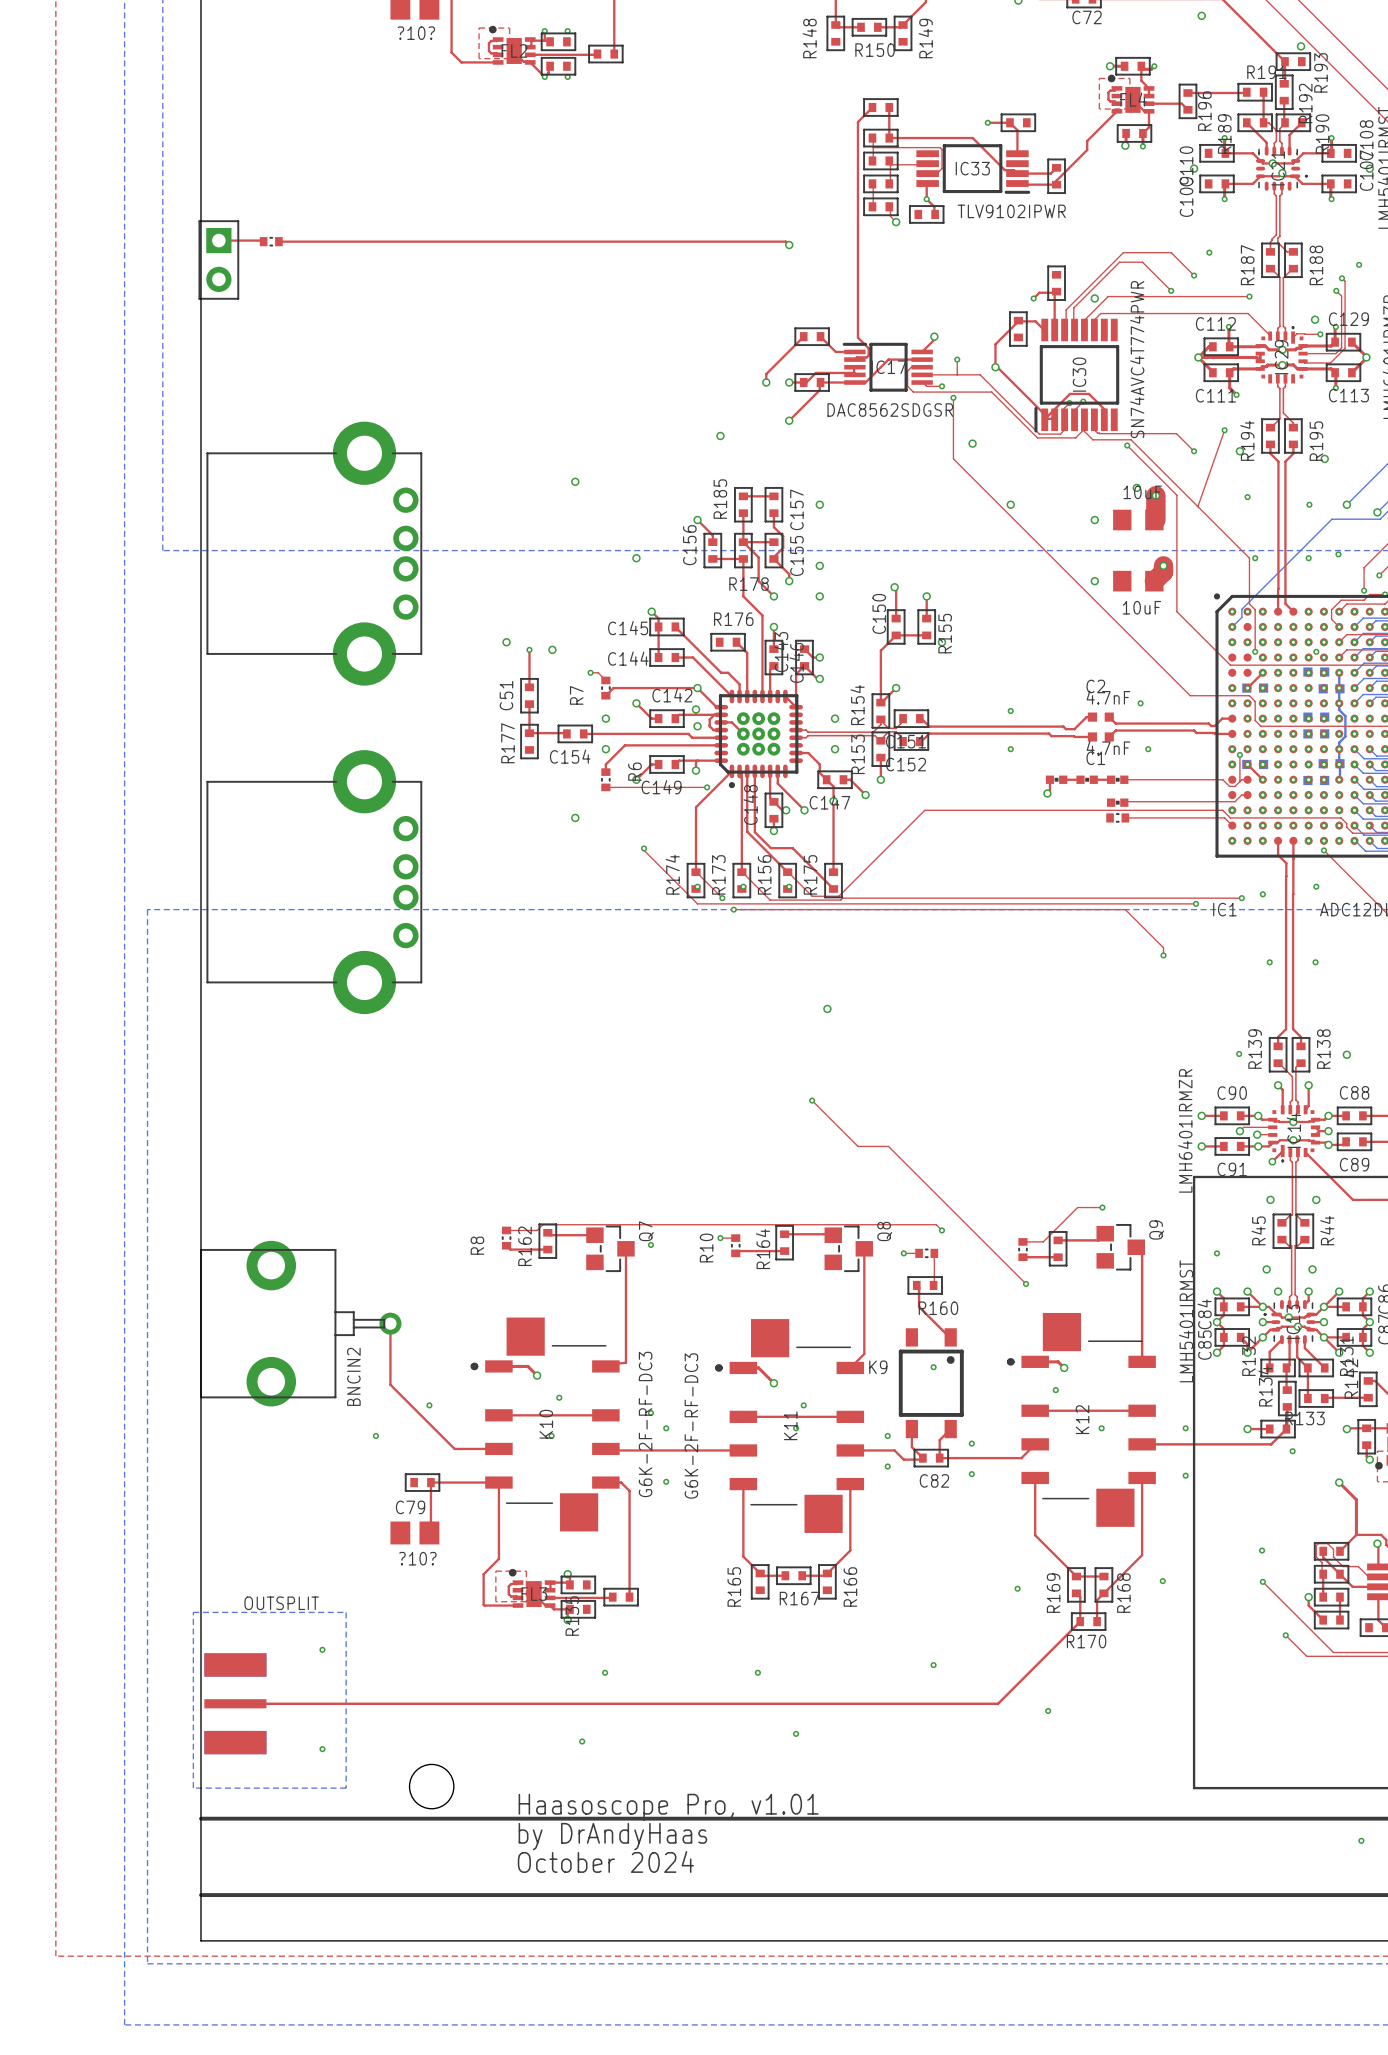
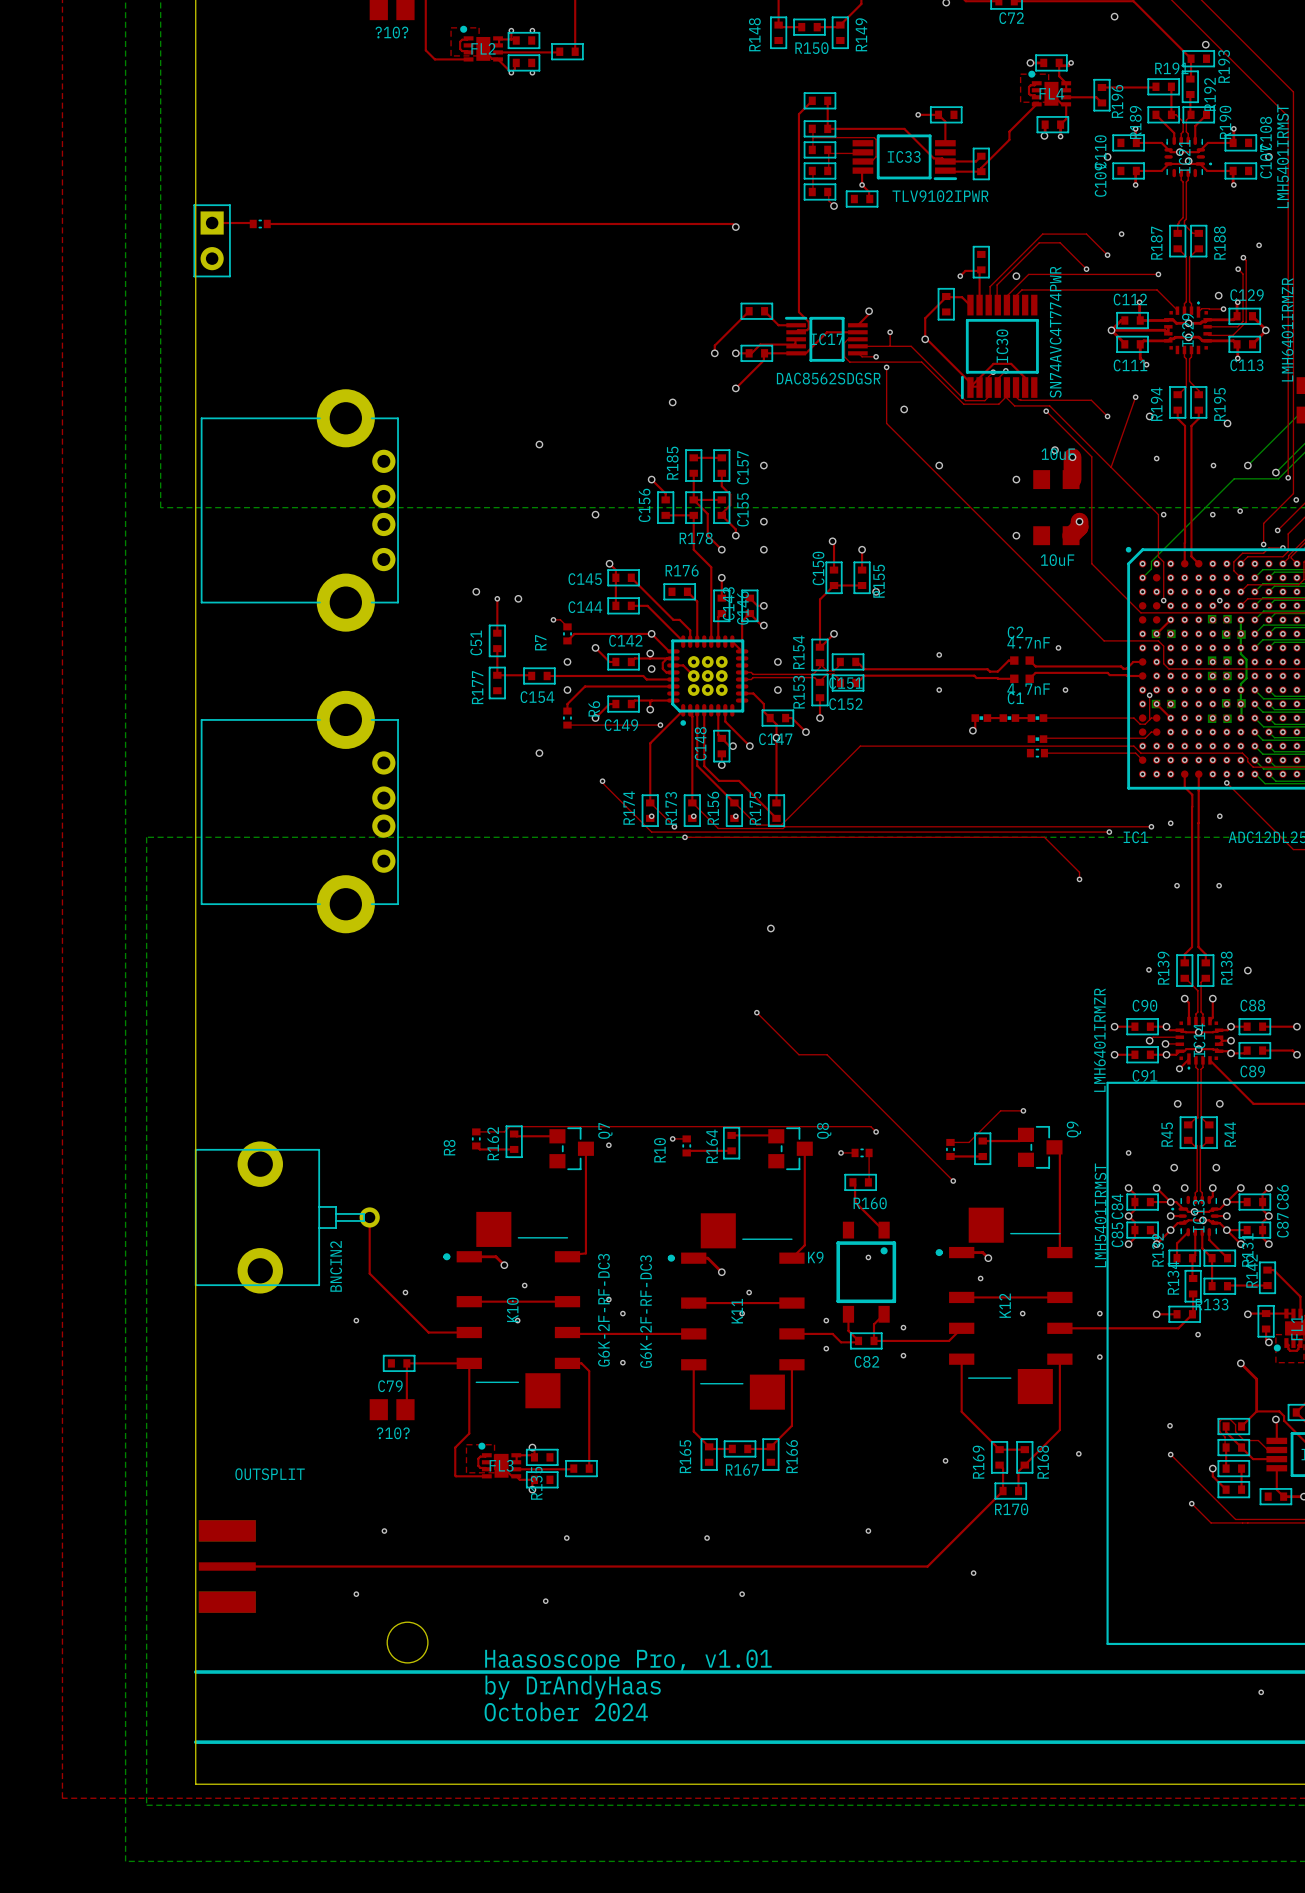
bottom zone outline: (193, 1612) (346, 1612) (346, 1788) (193, 1788) (193, 1612) -> none
via: (322, 1649) -> none
via: none -> (384, 1531)
via: none -> (356, 1594)
via: (322, 1749) -> none

